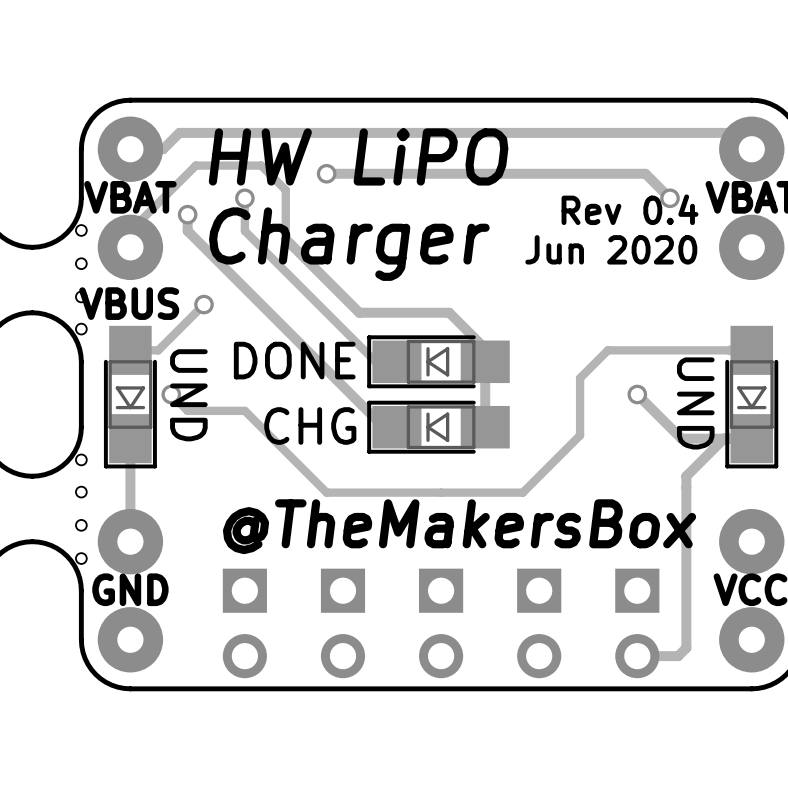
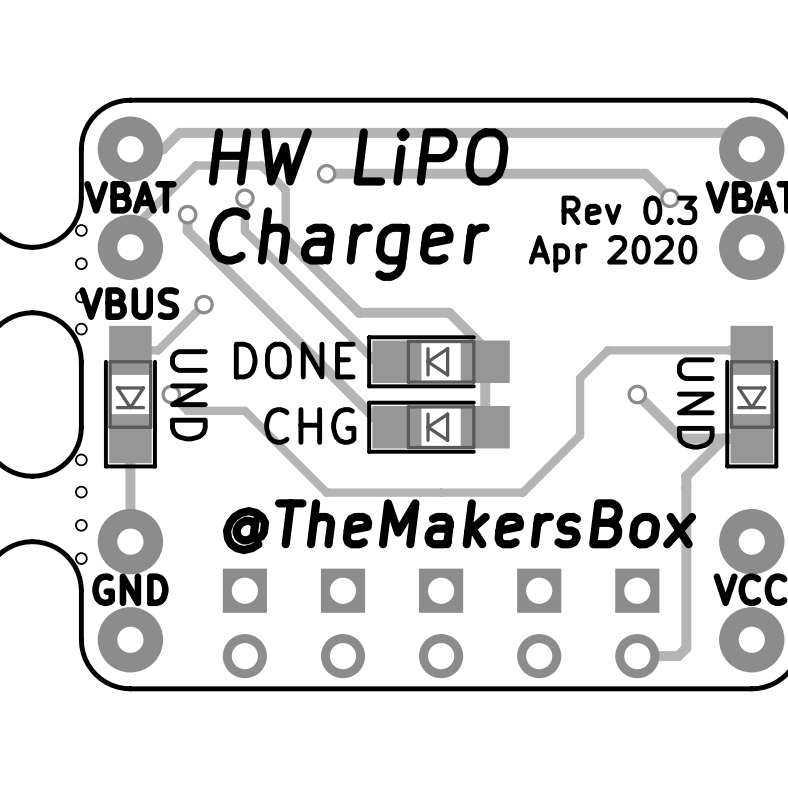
text: Rev 0.4 (630, 209) -> Rev 0.3 (629, 210)
text: Jun 2020 (611, 249) -> Apr 2020 (613, 253)

